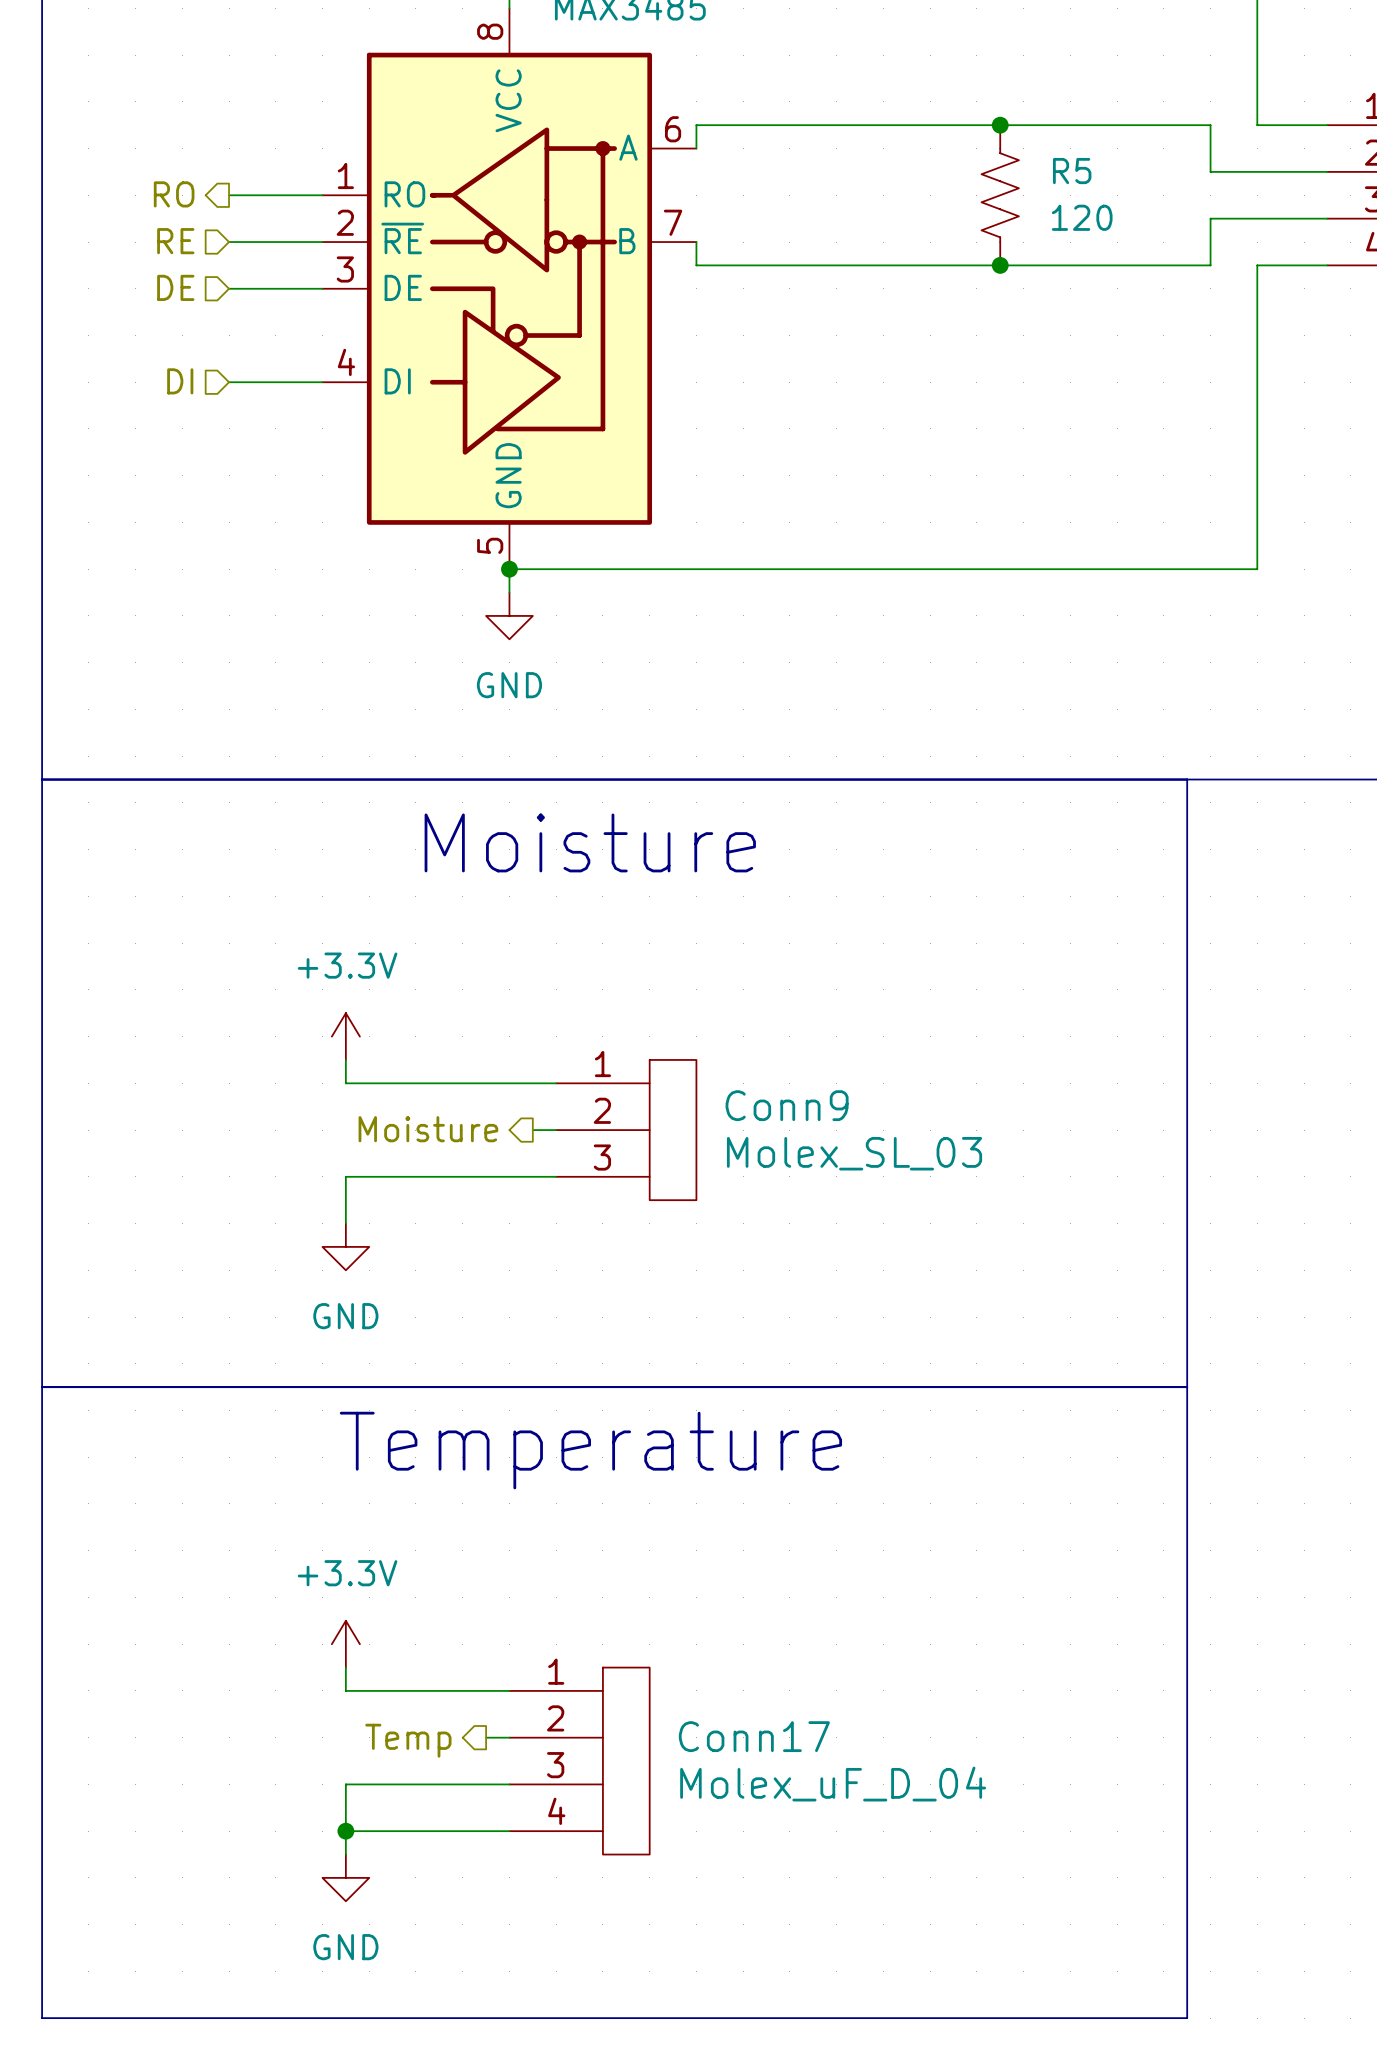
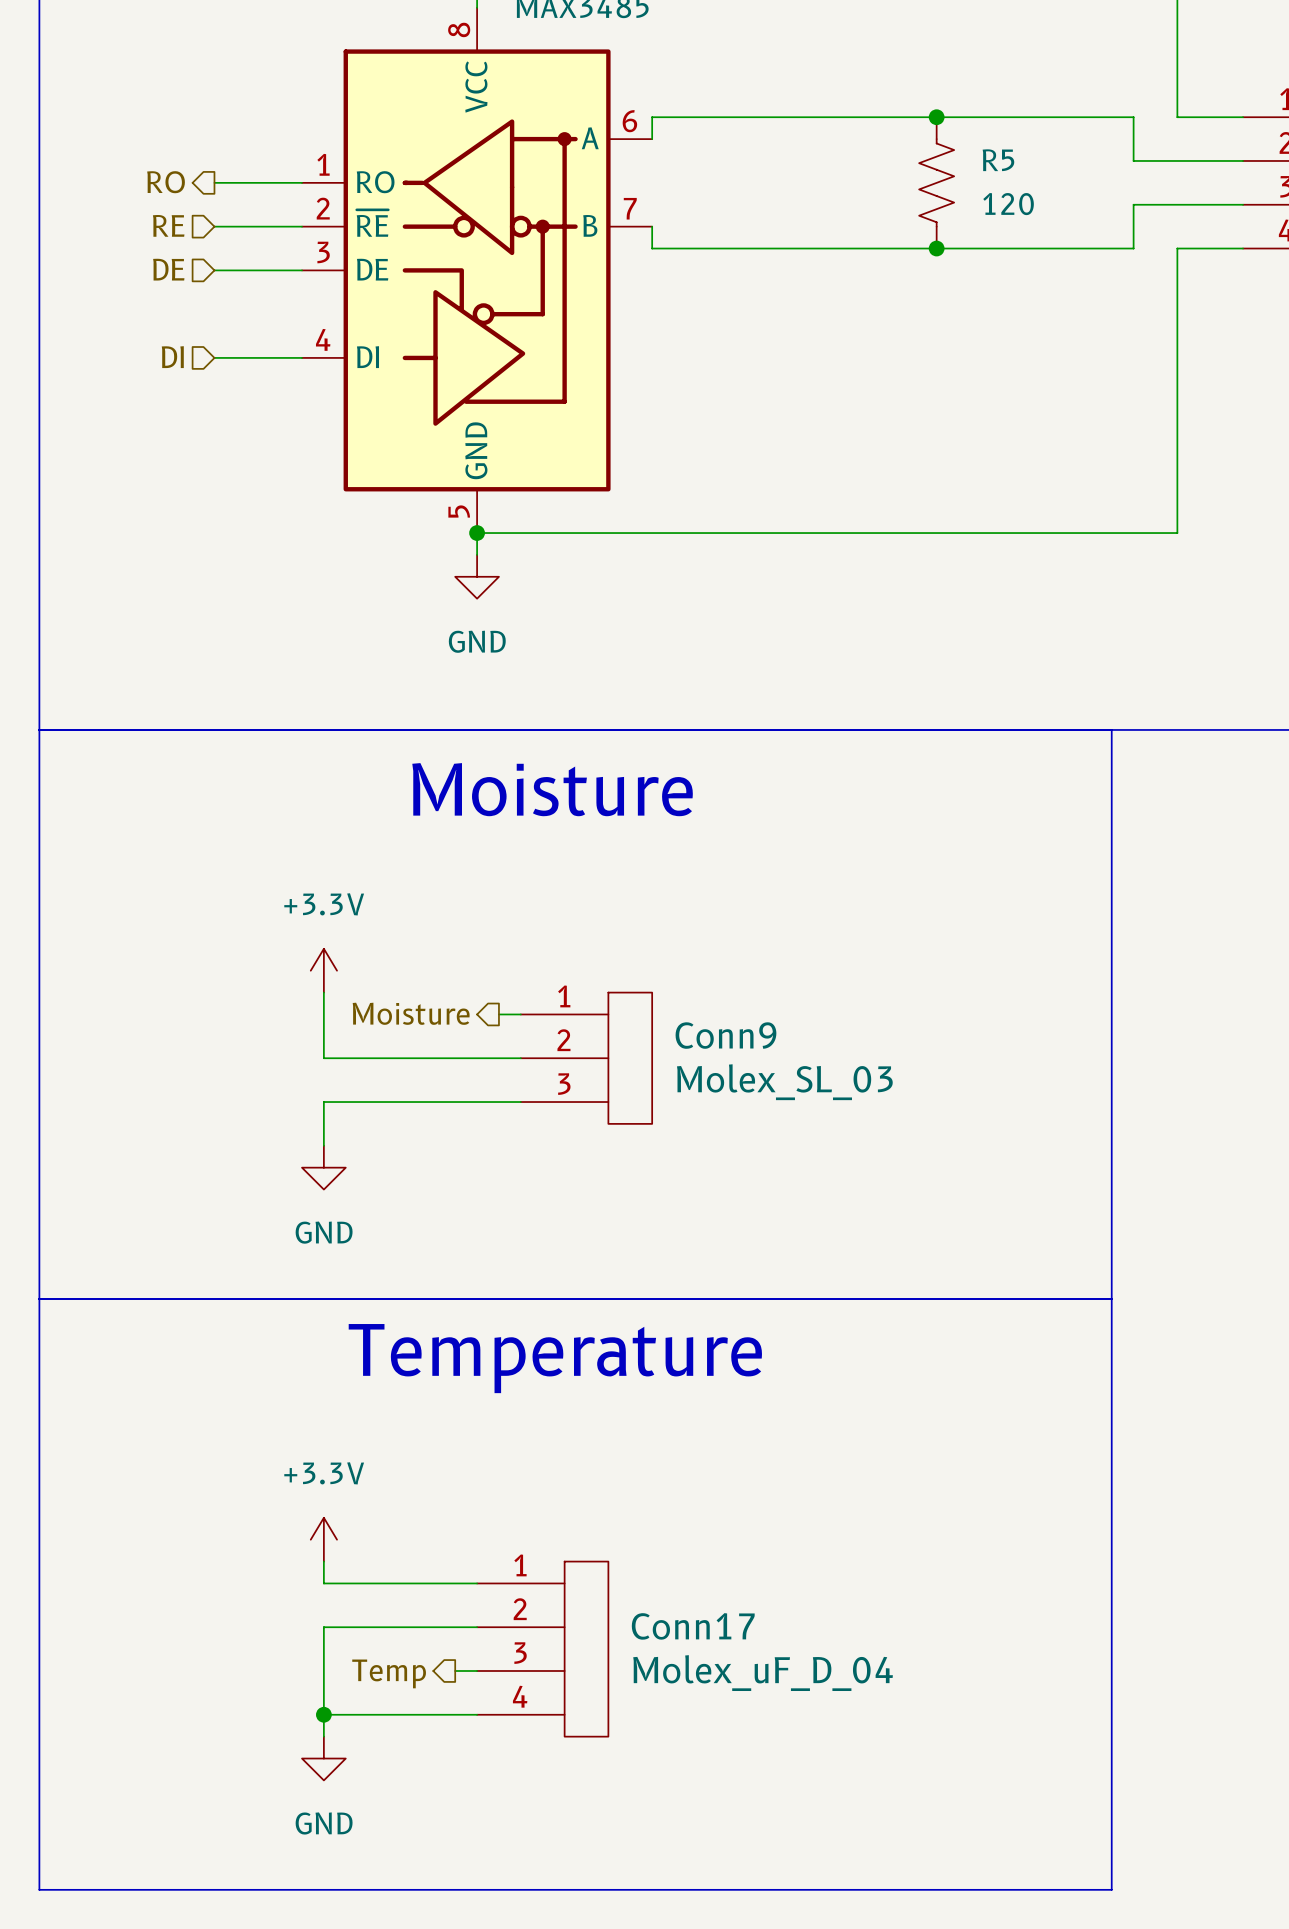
wire: (345, 1083) (532, 1083) -> (323, 1014) (323, 1058) (498, 1058)
hierarchical label position: Moisture (428, 1129) -> Moisture (411, 1013)
hierarchical label position: Temp (408, 1740) -> Temp (389, 1673)
wire: (345, 1784) (486, 1784) -> (323, 1670) (323, 1627) (455, 1627)

